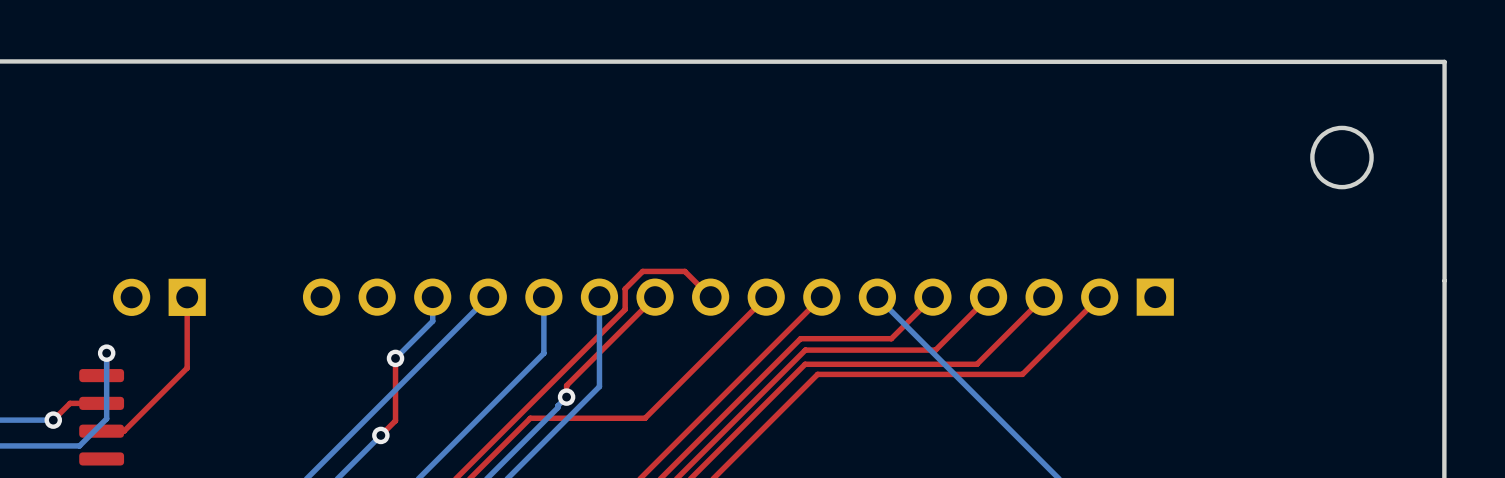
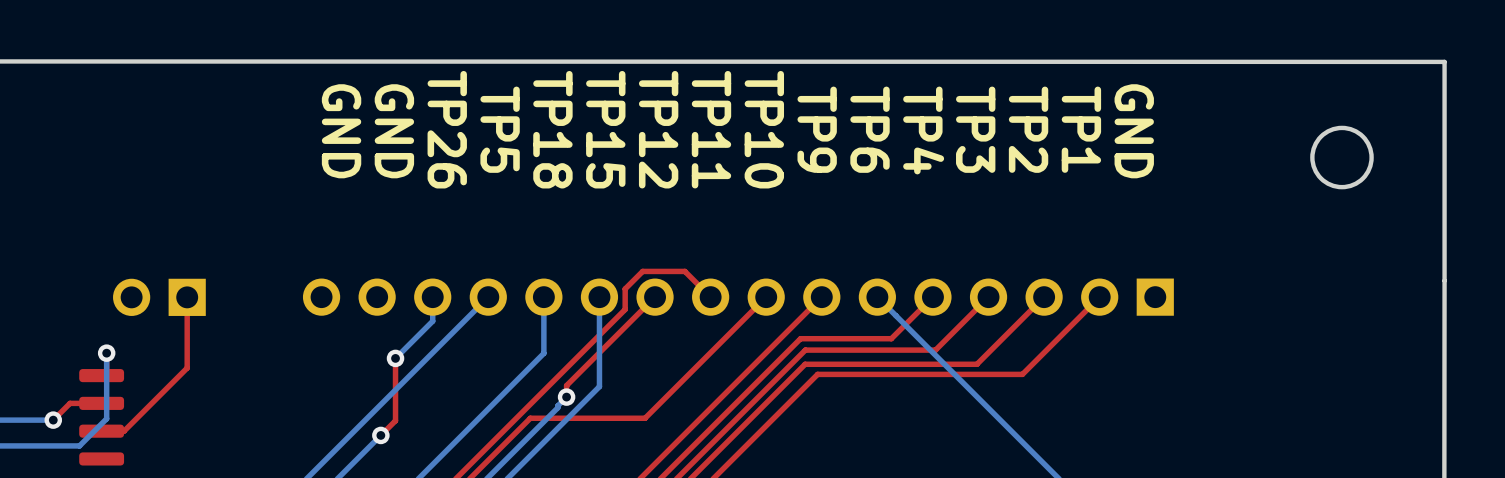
text: none -> TP26 (447, 129)
text: none -> TP5 (500, 129)
text: none -> TP18 (552, 129)
text: none -> TP15 (605, 129)
text: none -> TP12 (658, 129)
text: none -> TP11 (711, 129)
text: none -> TP10 (764, 129)
text: none -> TP9 (817, 129)
text: none -> TP6 (870, 129)
text: none -> TP3 (975, 129)
text: none -> TP2 (1028, 129)
text: none -> TP1 (1081, 129)
text: none -> TP4 (923, 130)
text: none -> GND (341, 131)
text: none -> GND (394, 131)
text: none -> GND (1134, 131)

